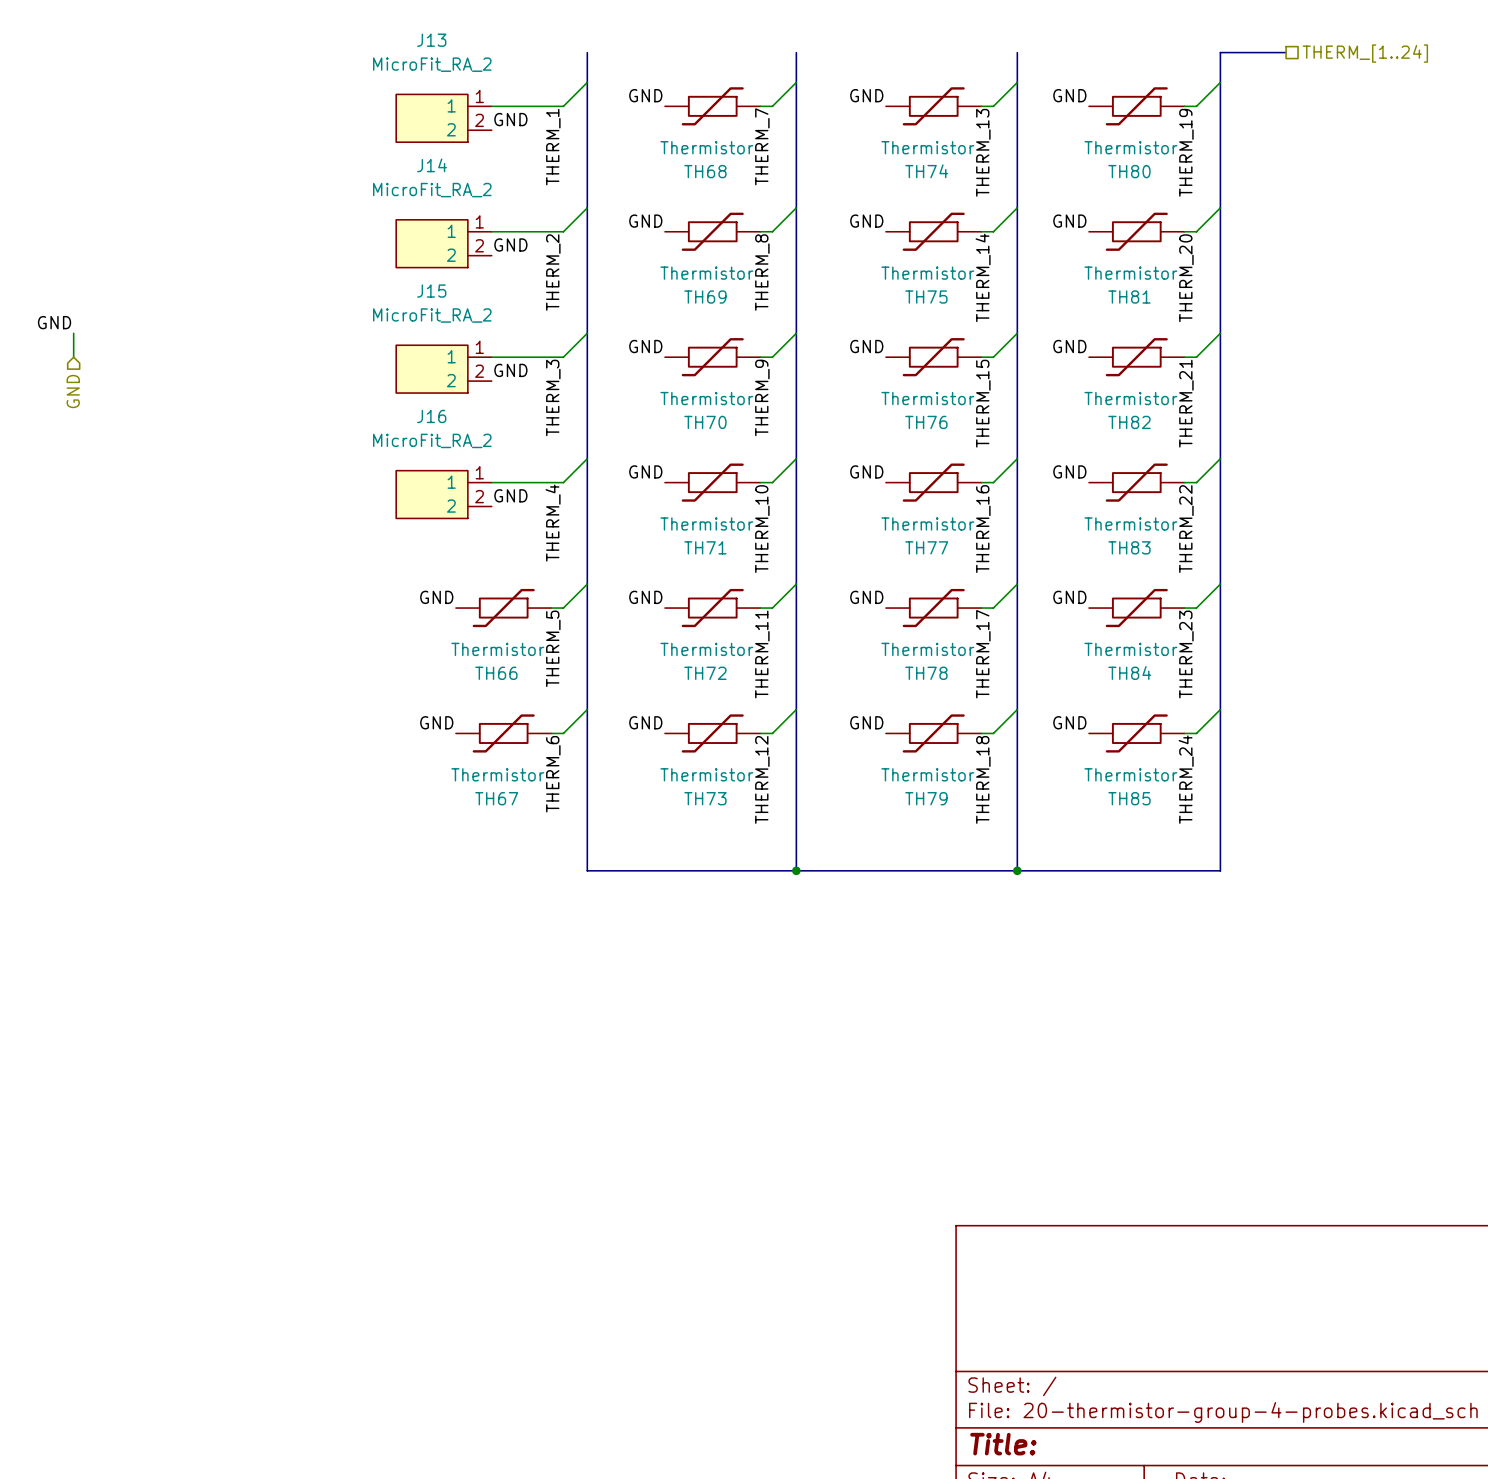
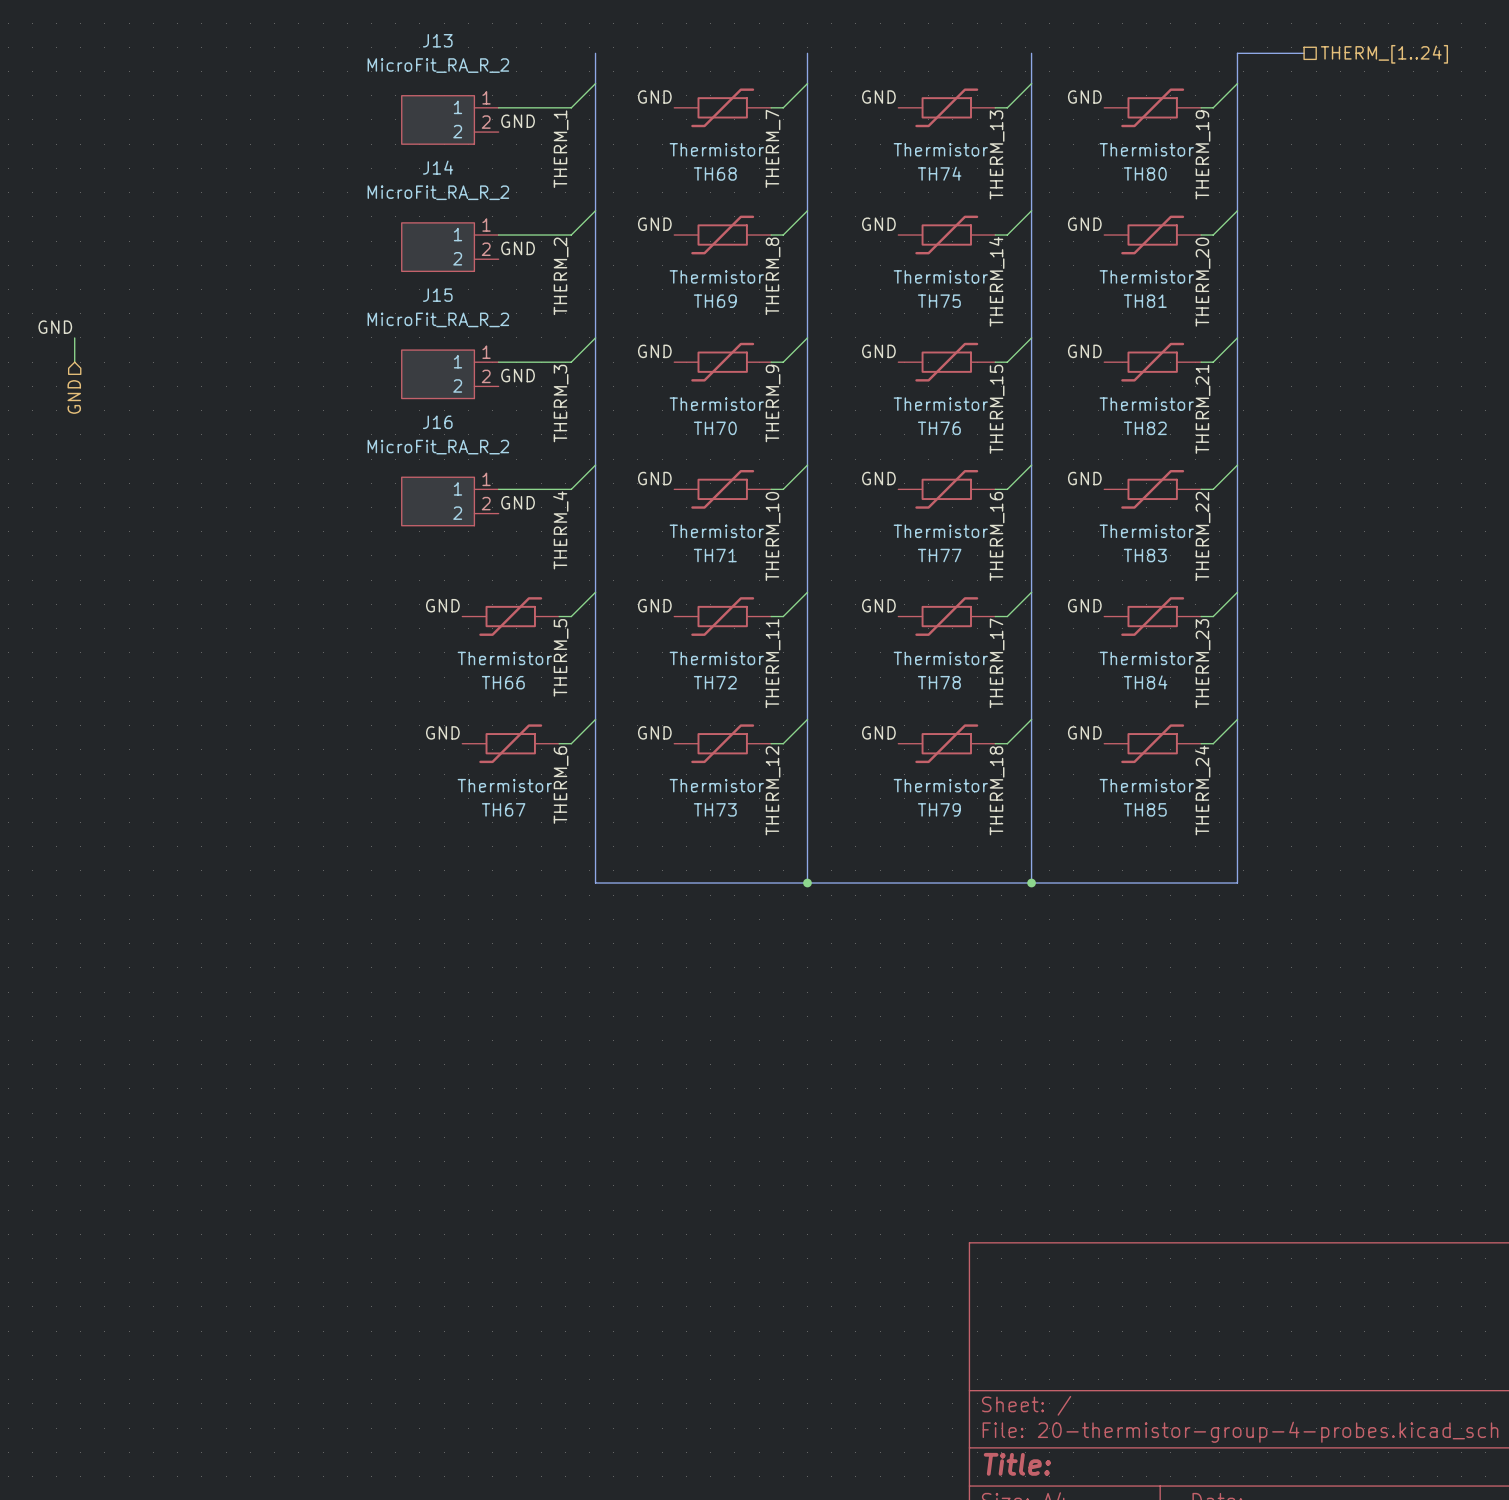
J13 value: MicroFit_RA_2 (432, 64) -> MicroFit_RA_R_2 (438, 65)
J14 value: MicroFit_RA_2 (432, 190) -> MicroFit_RA_R_2 (438, 192)
J15 value: MicroFit_RA_2 (432, 315) -> MicroFit_RA_R_2 (438, 319)
J16 value: MicroFit_RA_2 (432, 440) -> MicroFit_RA_R_2 (438, 447)

